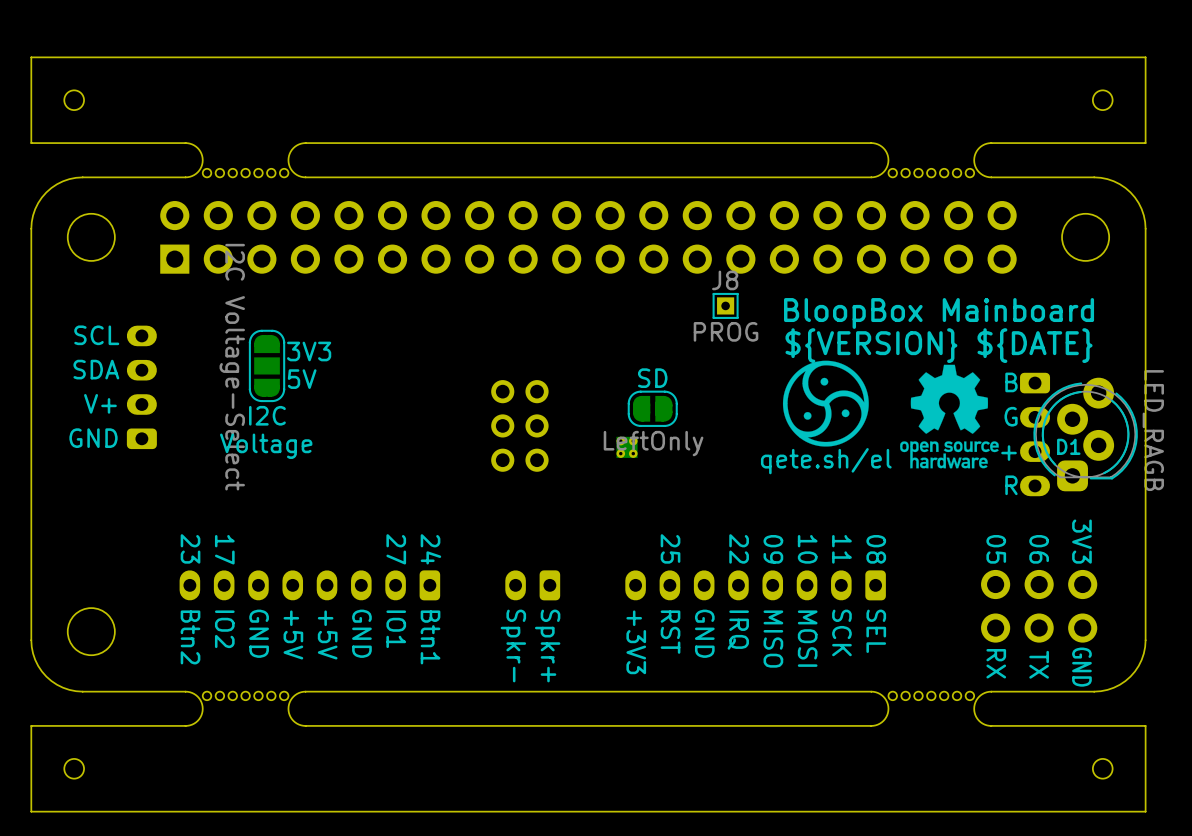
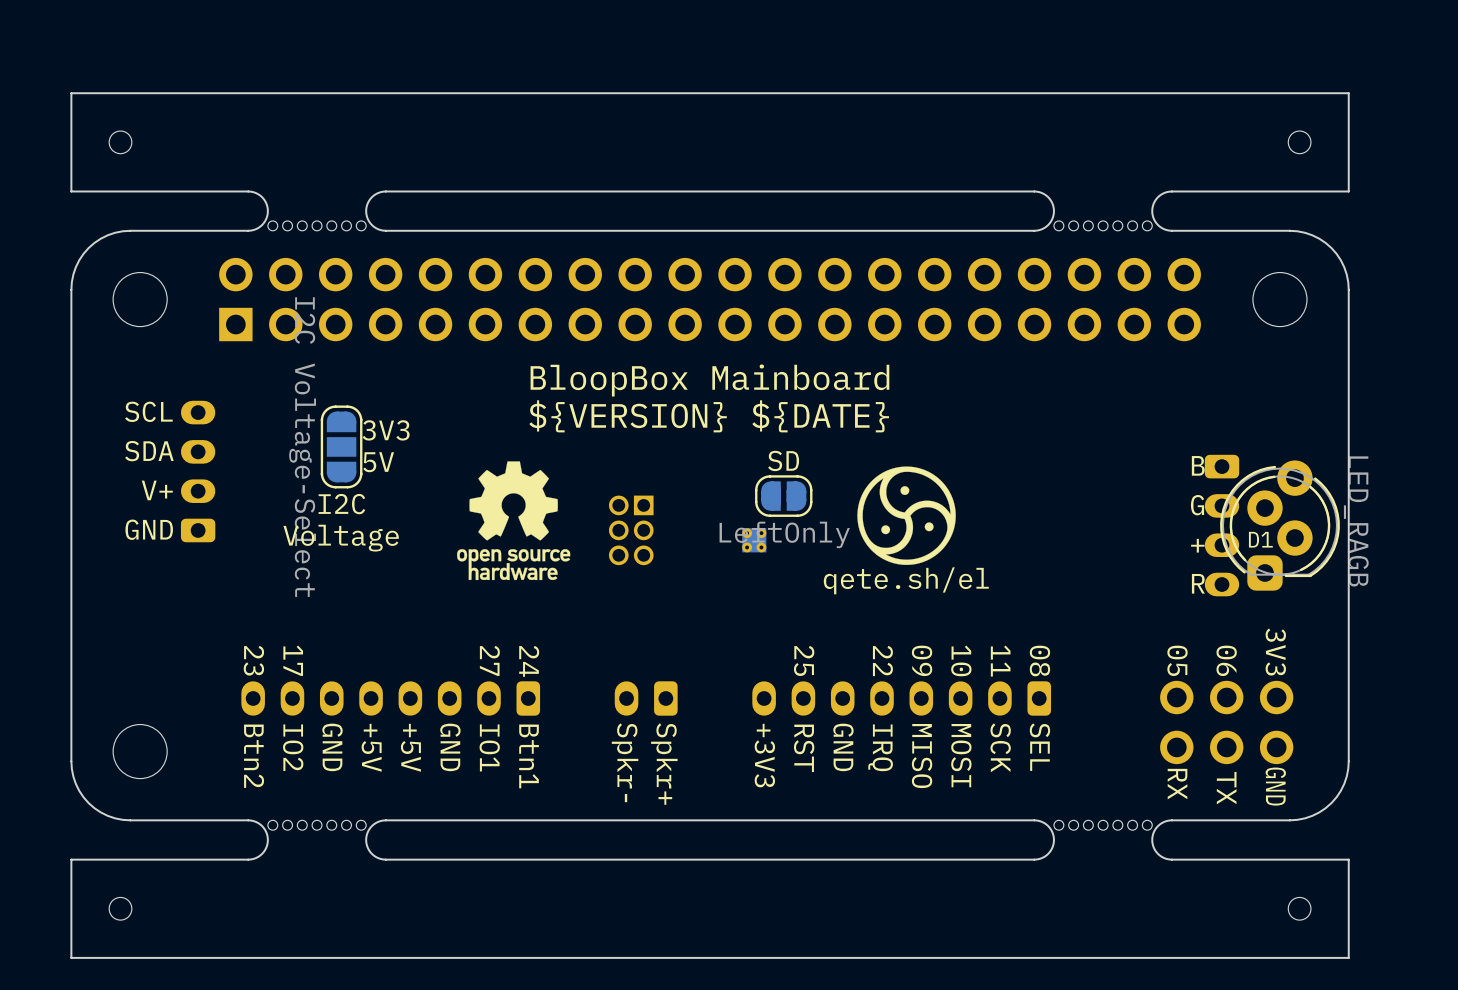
J8: PROG (725, 305) -> none
text position: BloopBox Mainboard (939, 313) -> BloopBox Mainboard (709, 380)
text position: ${VERSION} ${DATE} (939, 345) -> ${VERSION} ${DATE} (709, 416)
drawing: [900, 364, 999, 469] -> none
drawing: none -> [457, 461, 571, 581]
part footprint: [491, 380, 549, 472] -> [608, 495, 654, 566]
drawing position: (825, 403) -> (906, 515)
text position: qete.sh/el (826, 461) -> qete.sh/el (906, 580)

